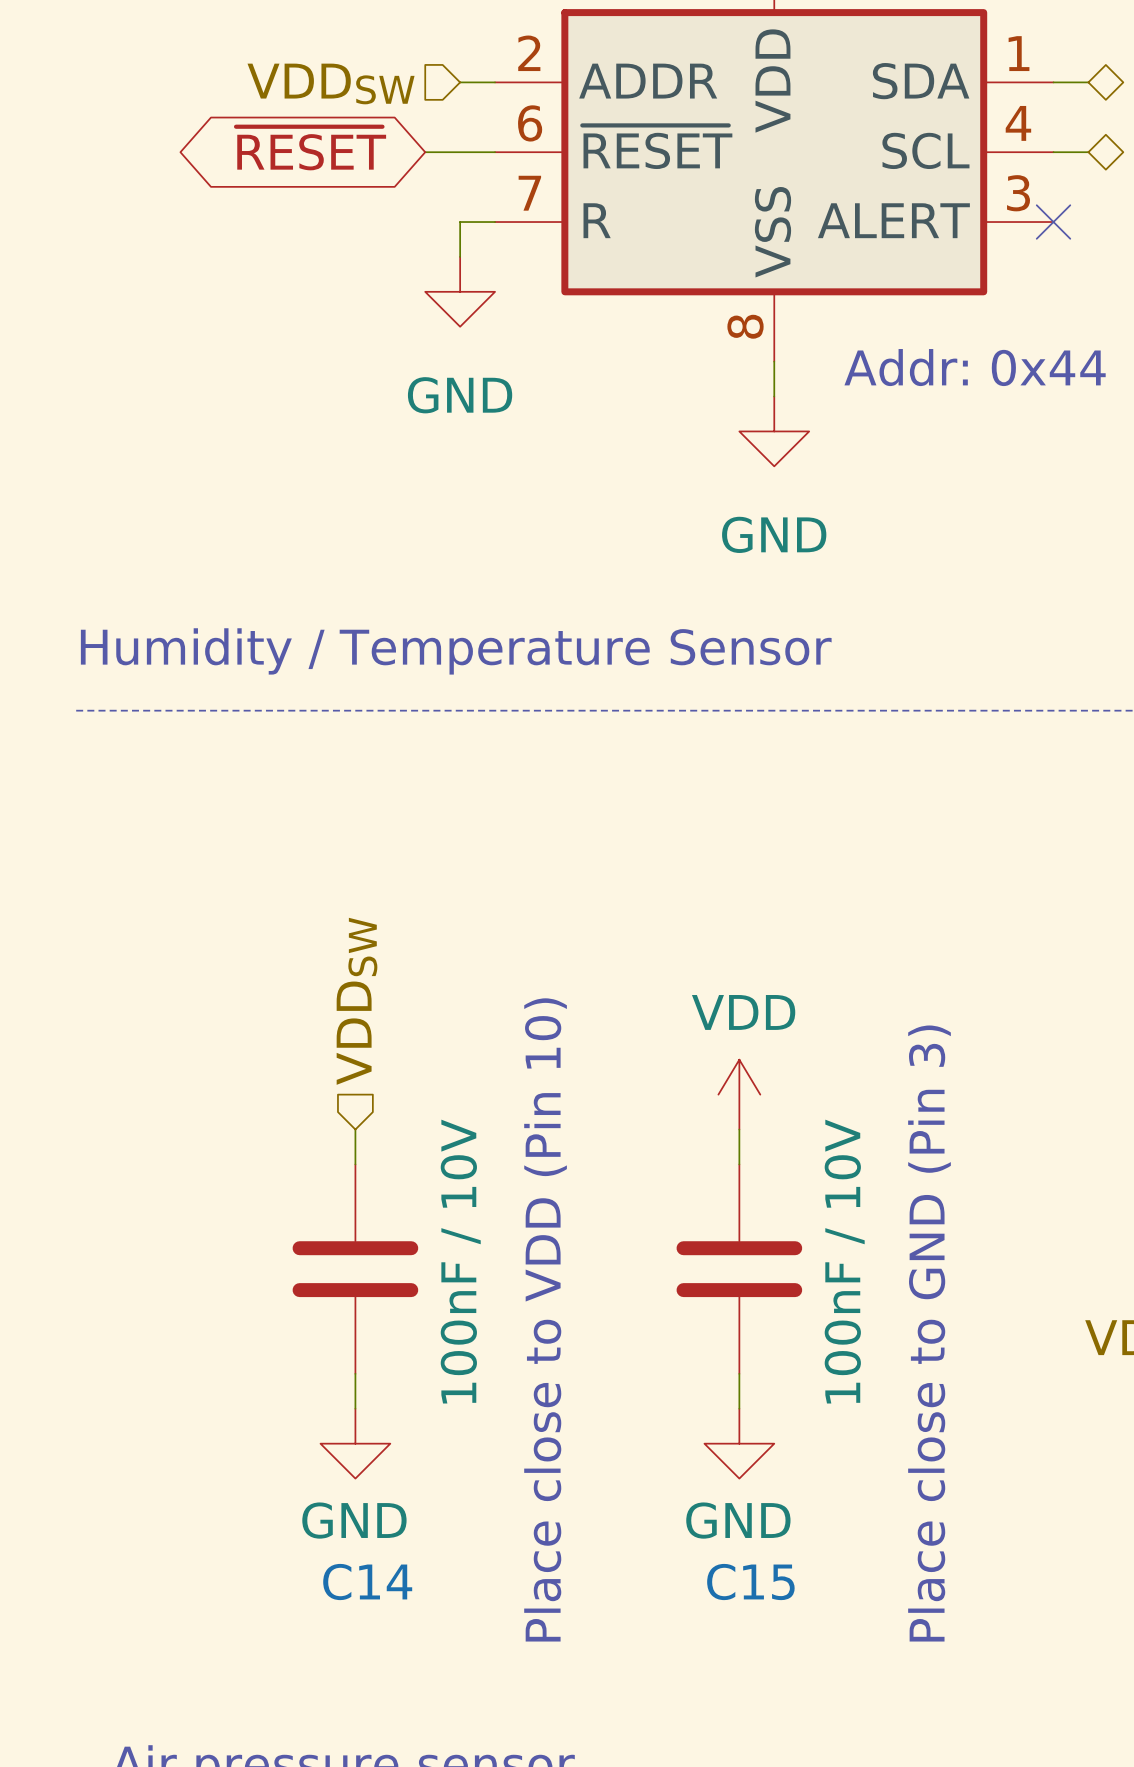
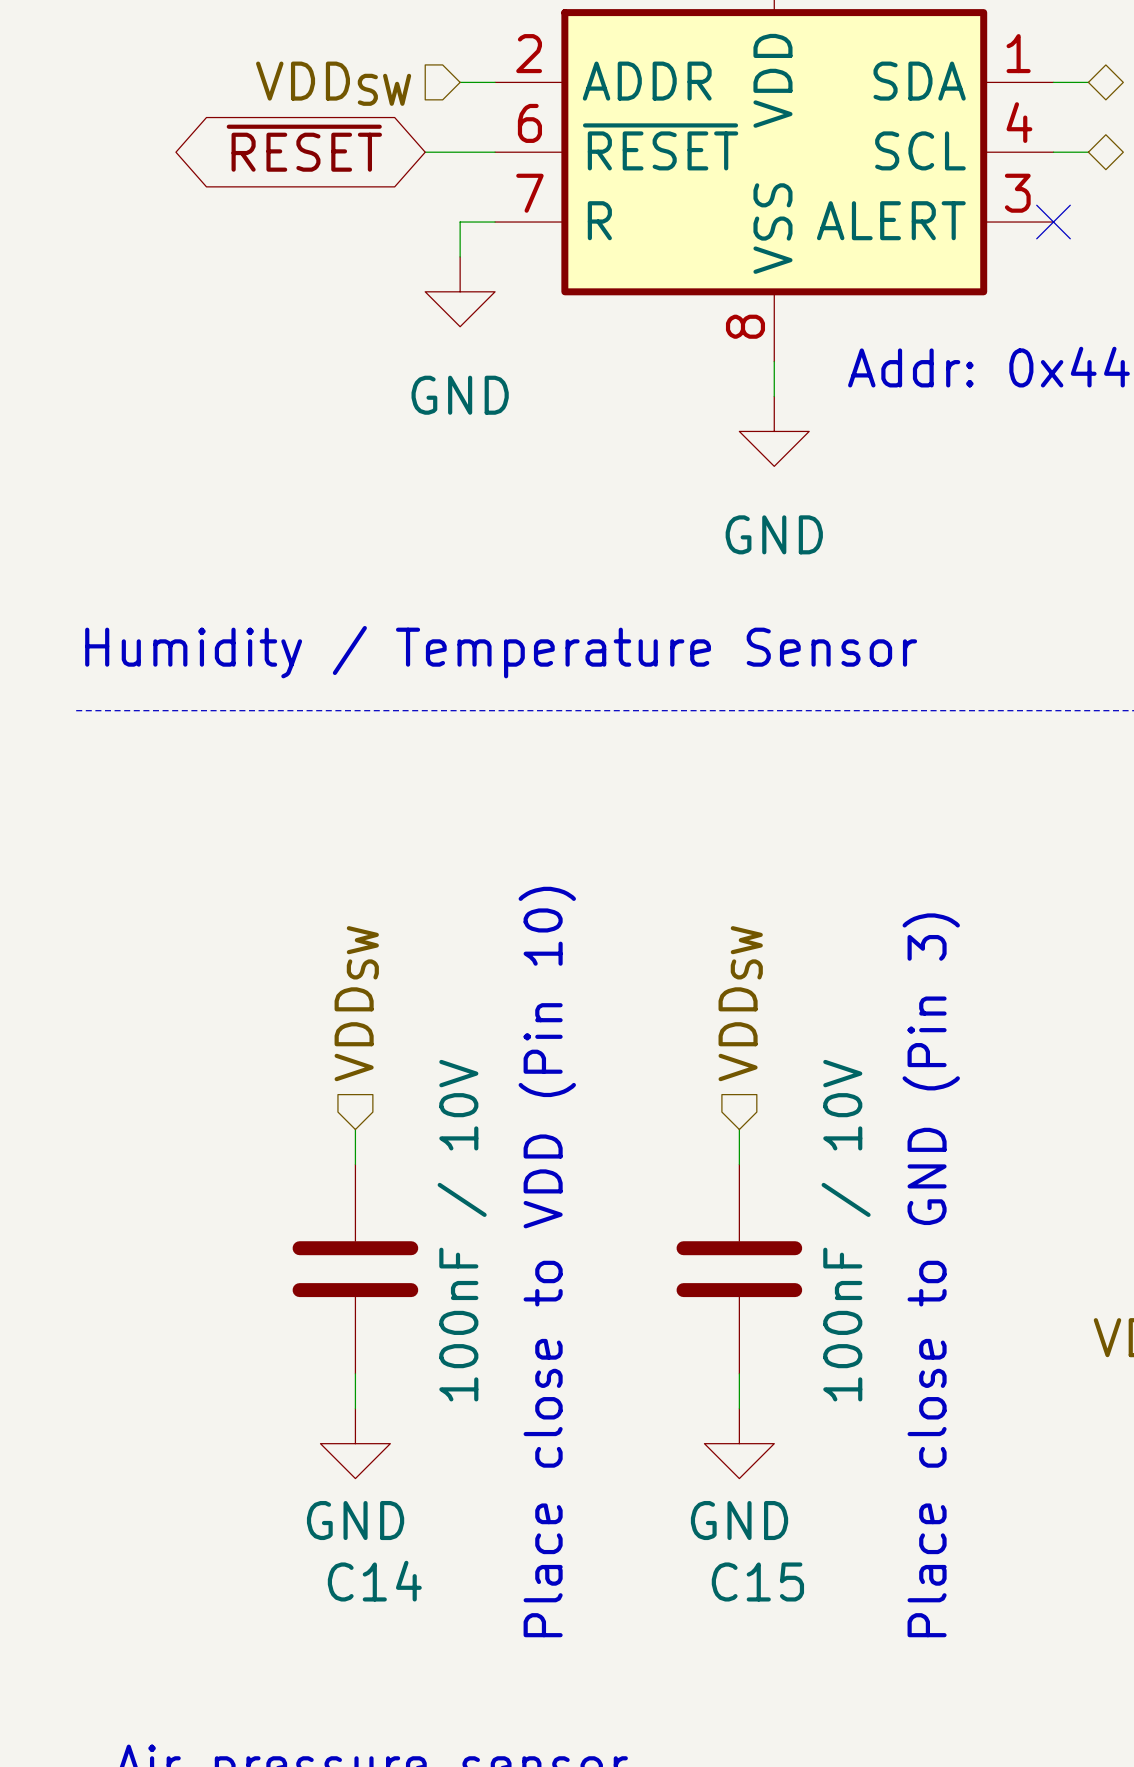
hierarchical label: none -> VDDSW (740, 1003)
power symbol: VDD (739, 1094) -> none

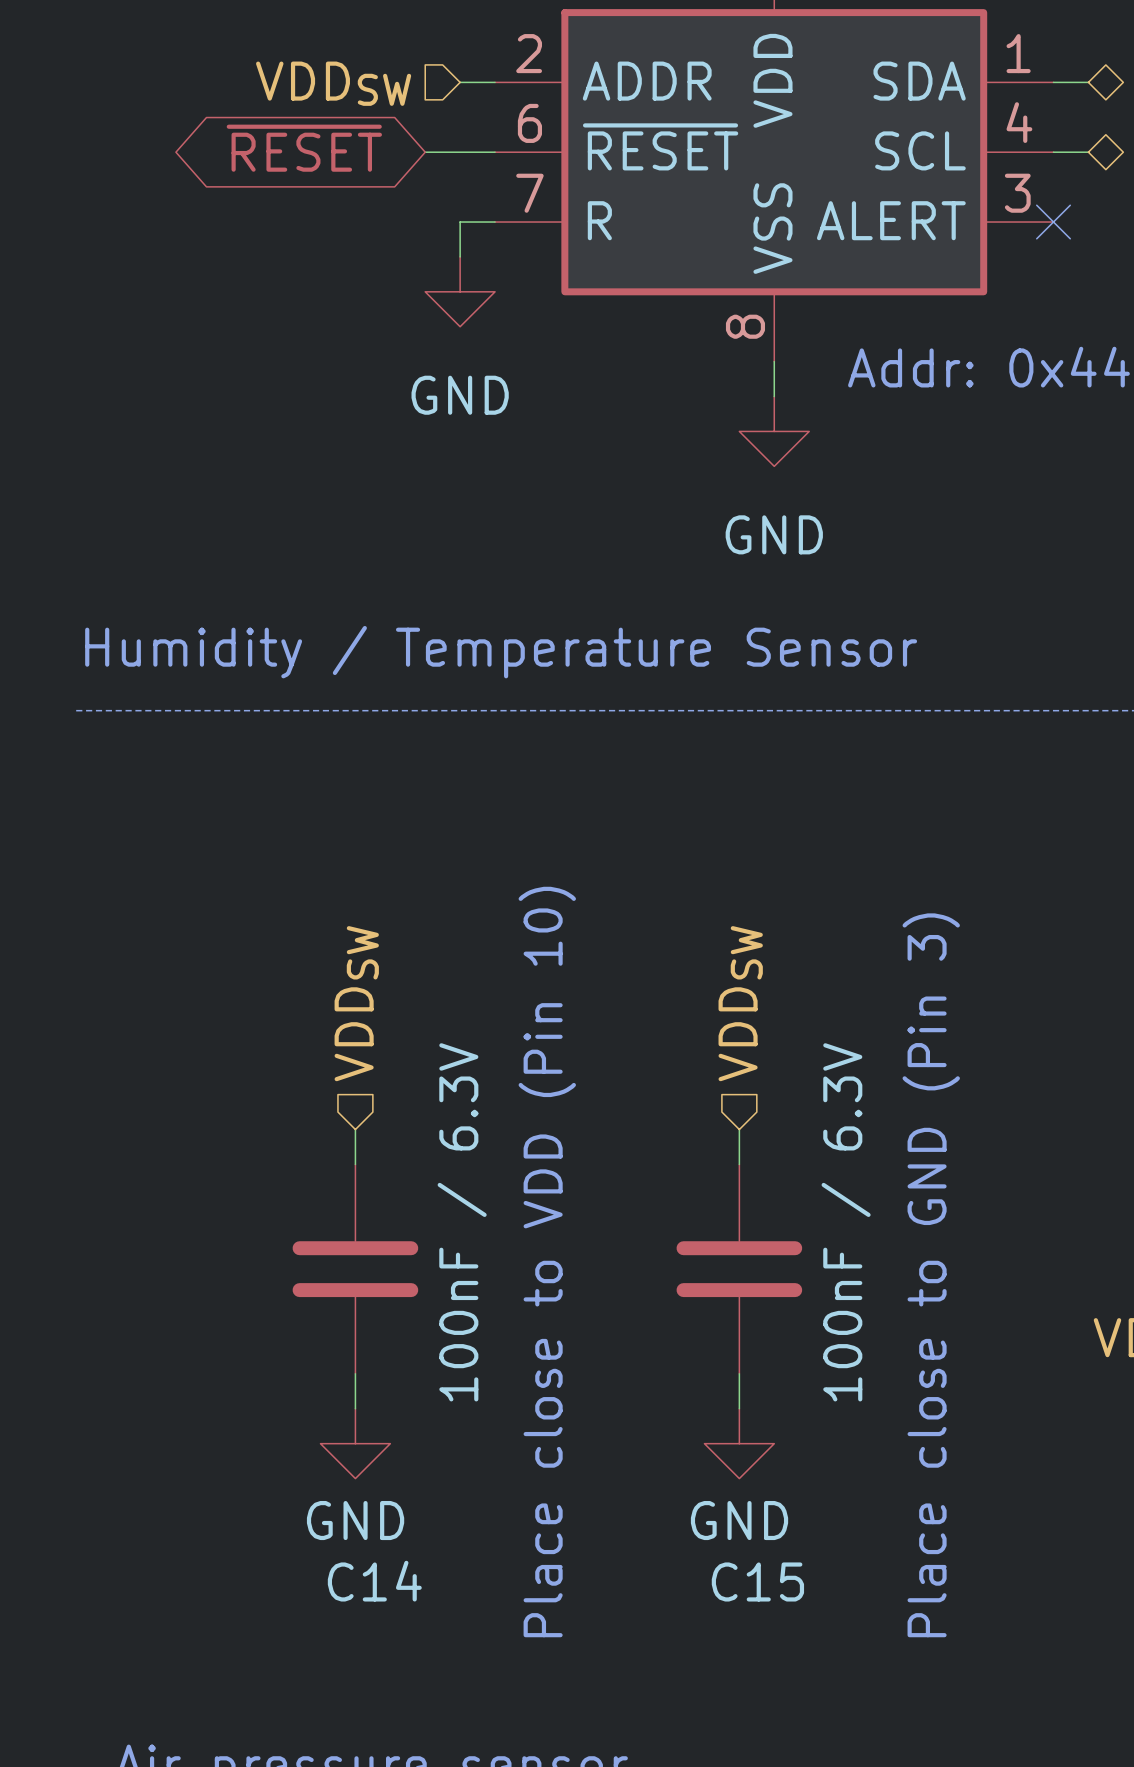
C14 value: 100nF / 10V (462, 1230) -> 100nF / 6.3V (462, 1222)
C15 value: 100nF / 10V (846, 1230) -> 100nF / 6.3V (846, 1222)

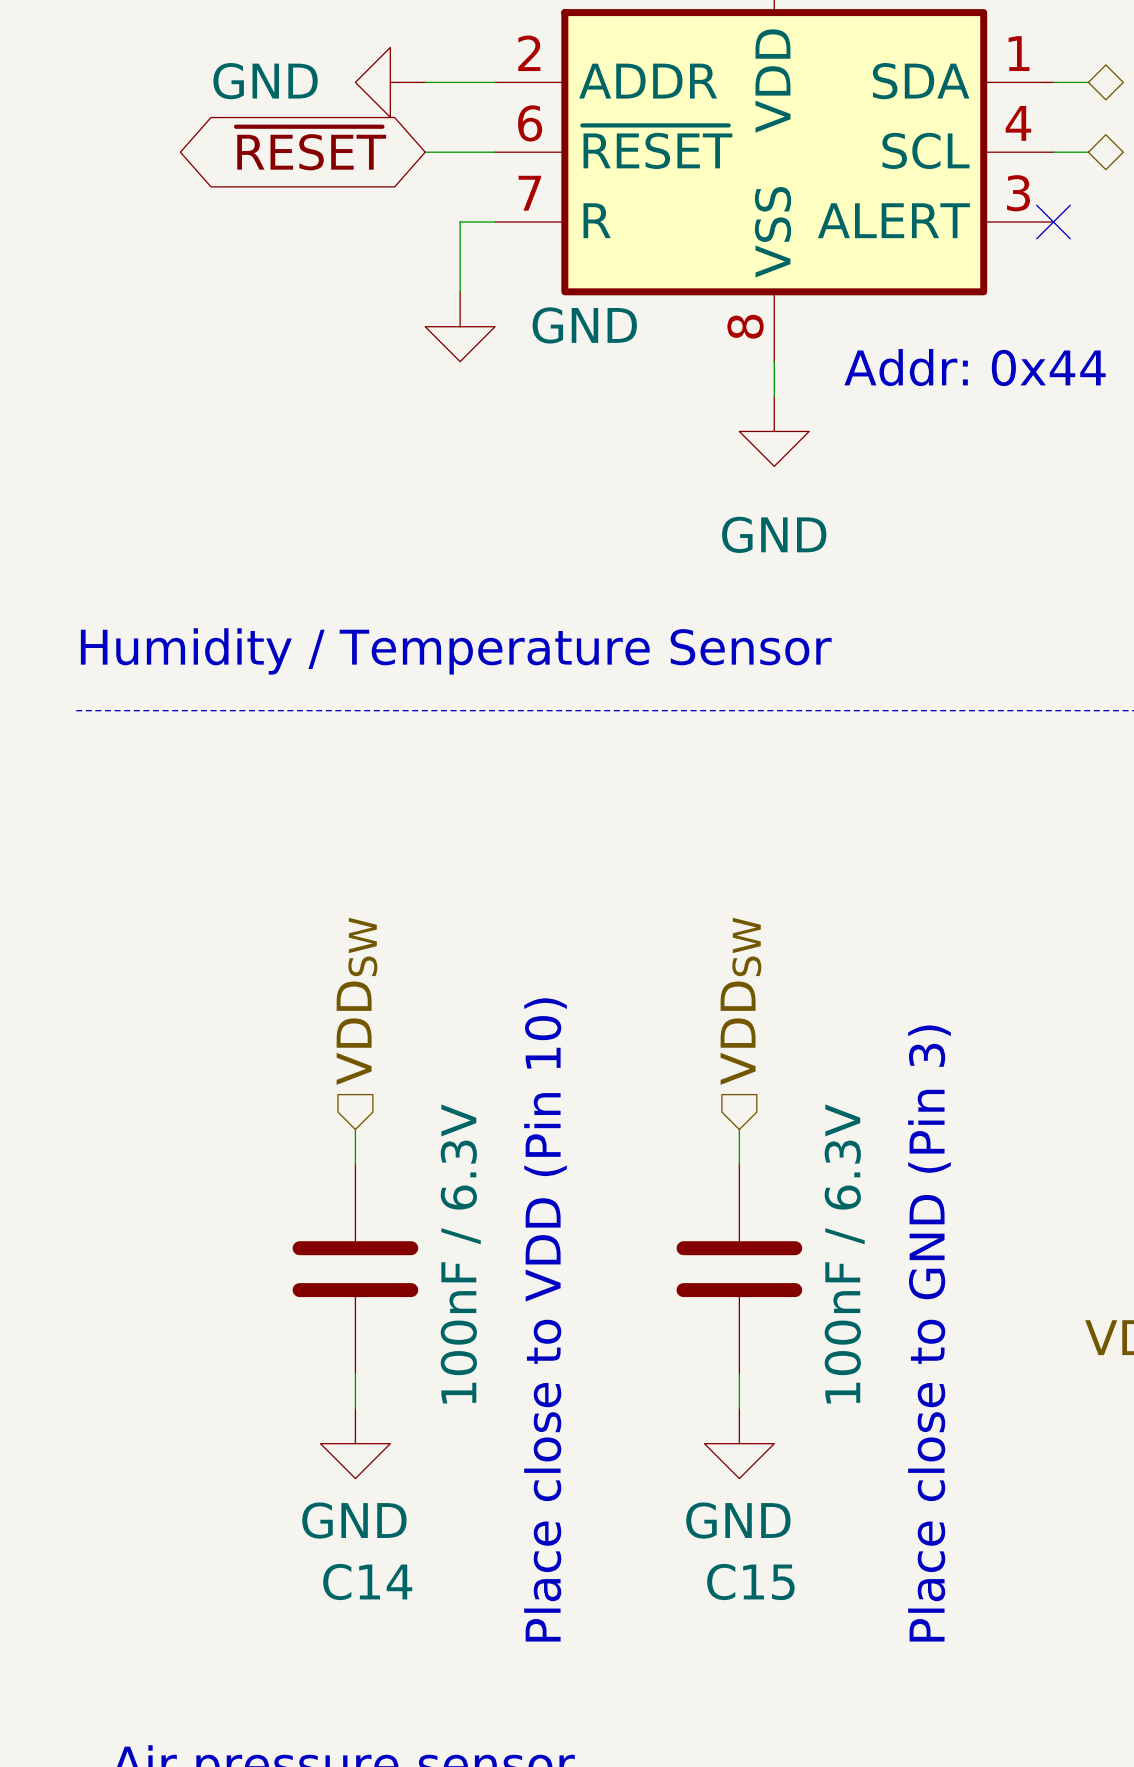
power symbol: none -> GND (390, 82)
wire: none -> (425, 82) (460, 82)
hierarchical label: VDDSW (333, 83) -> none
power symbol position: GND (460, 291) -> GND (460, 326)
power symbol text position: GND (460, 395) -> GND (584, 325)

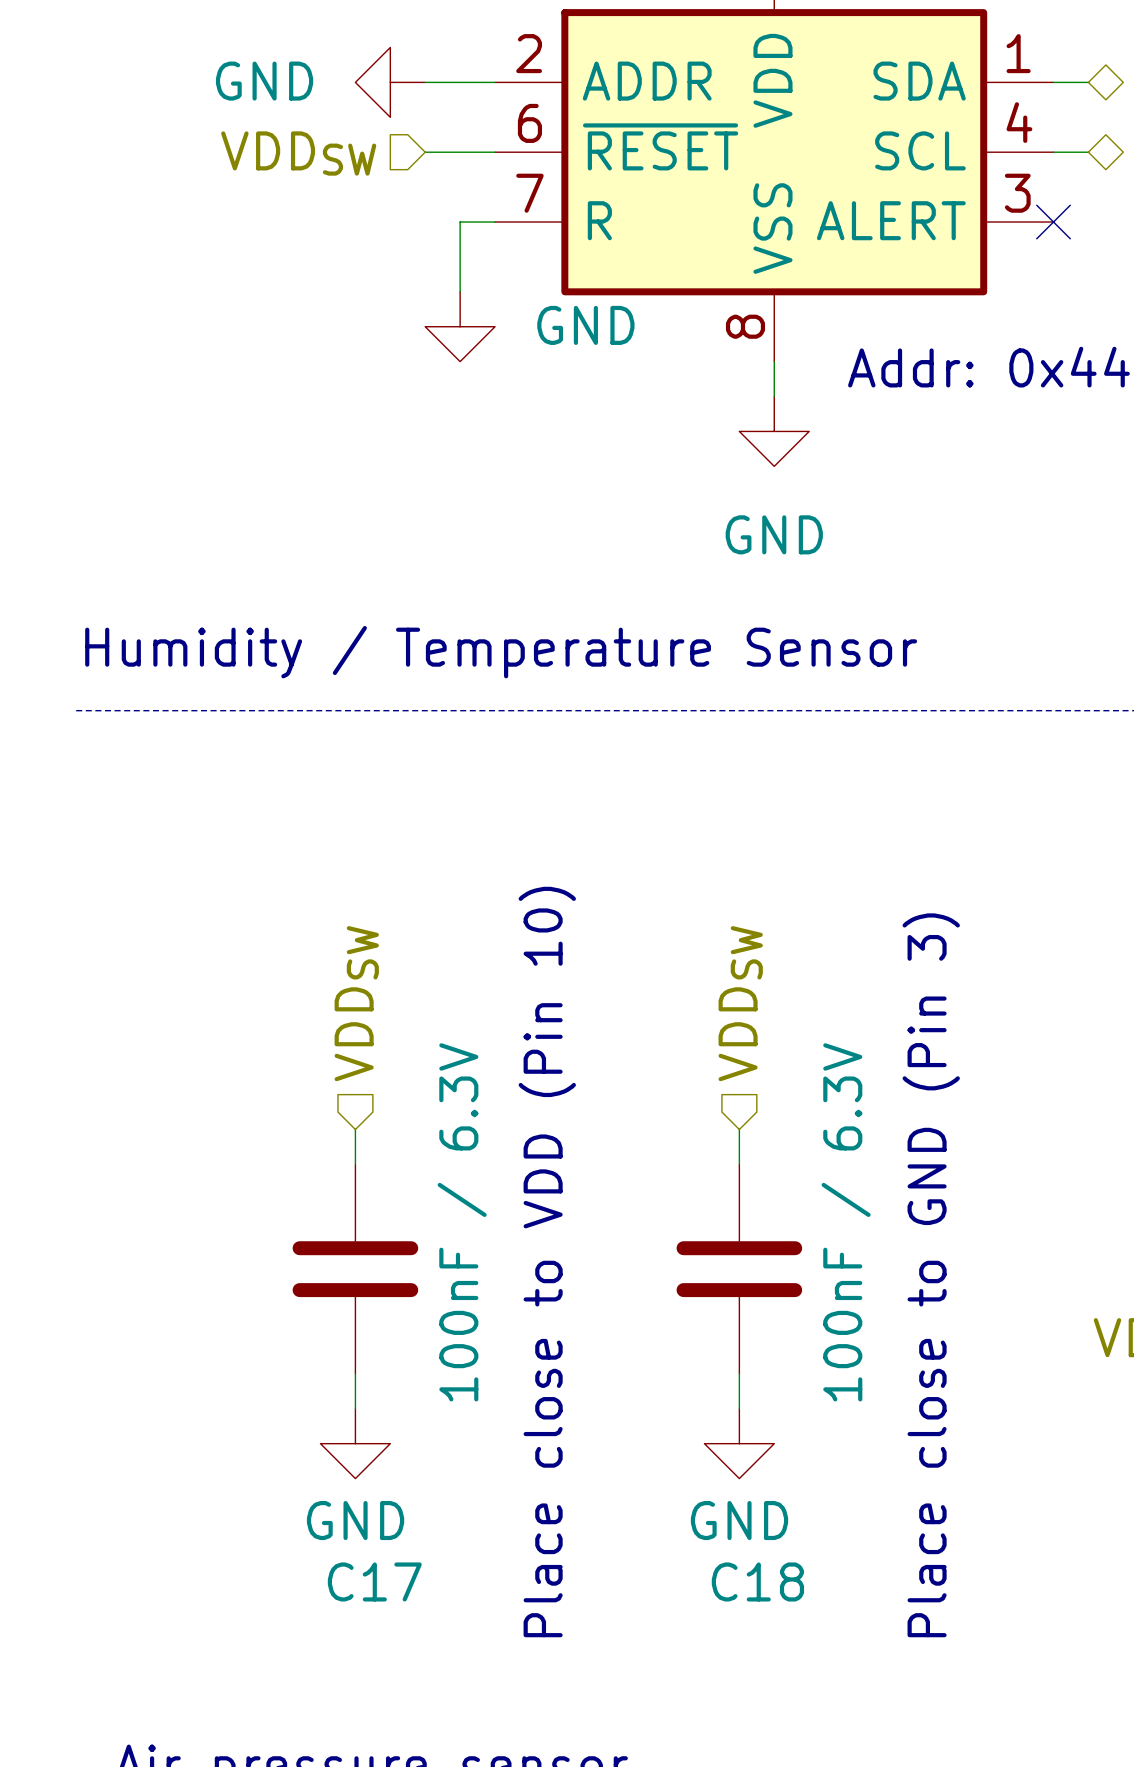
global label: ~{RESET} (311, 148) -> none
hierarchical label: none -> VDDSW (298, 153)
C14 name: C14 (367, 1582) -> C17 (374, 1581)
C15 name: C15 (750, 1582) -> C18 (757, 1581)

